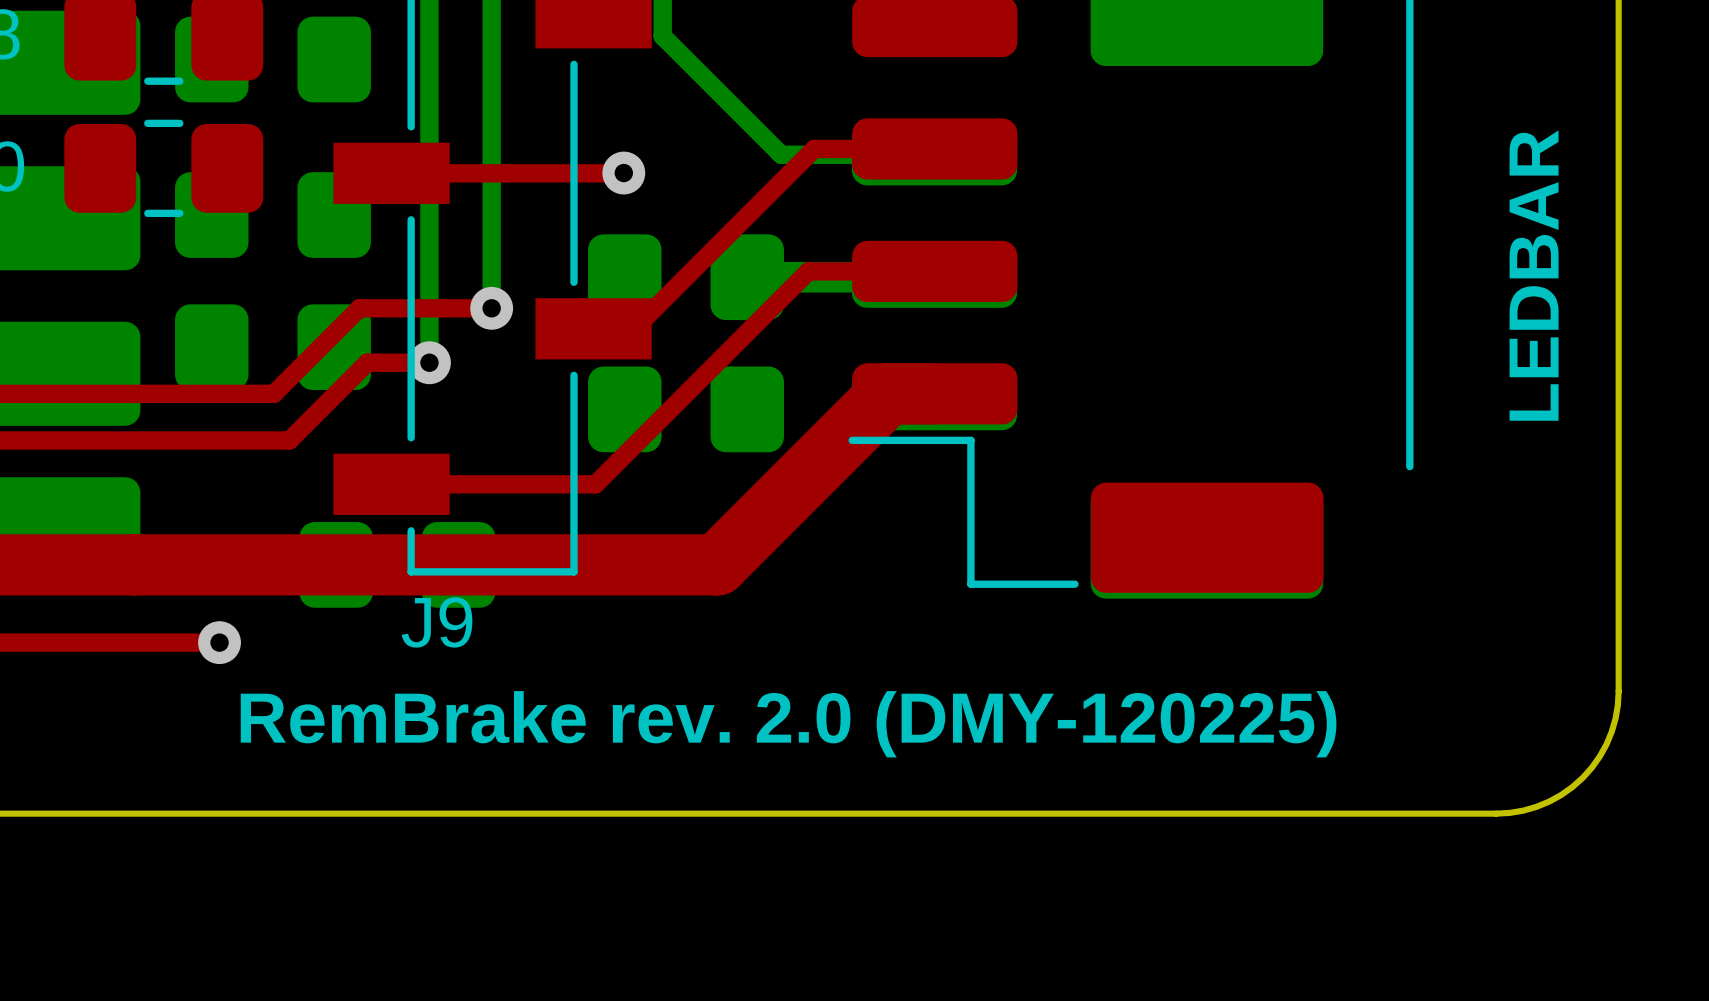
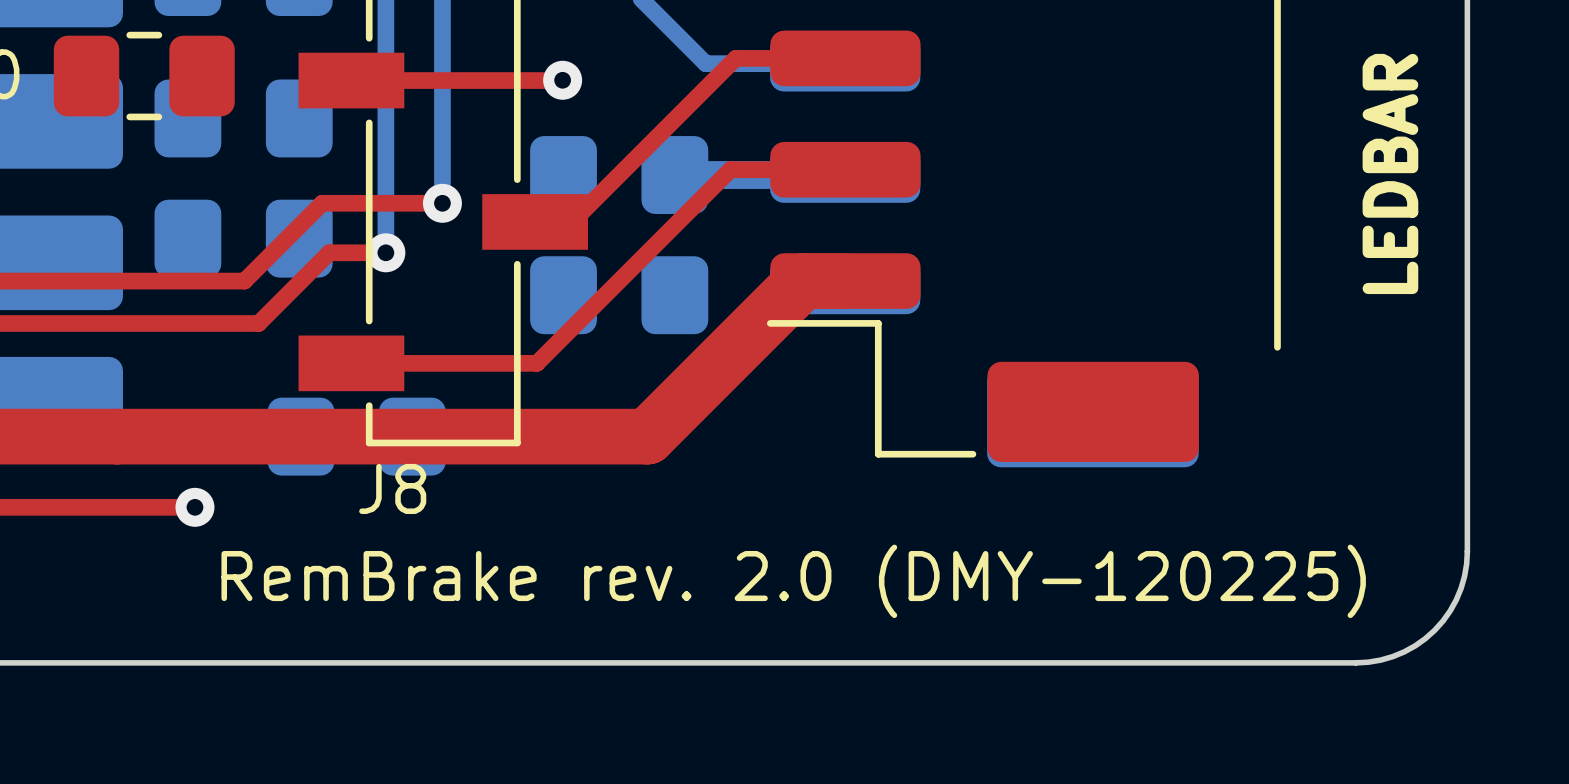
J9 name: J9 (437, 622) -> J8 (392, 488)

